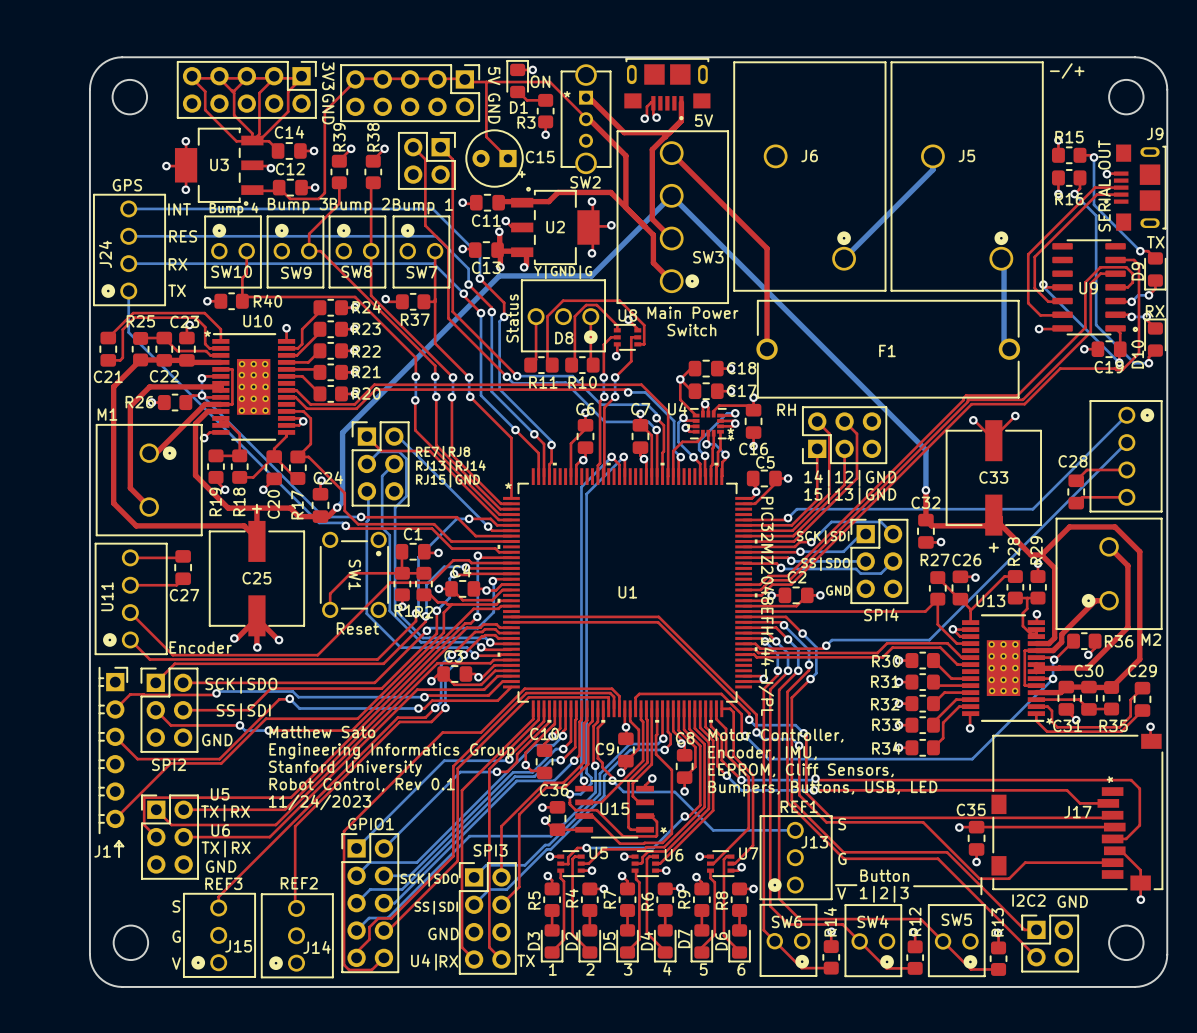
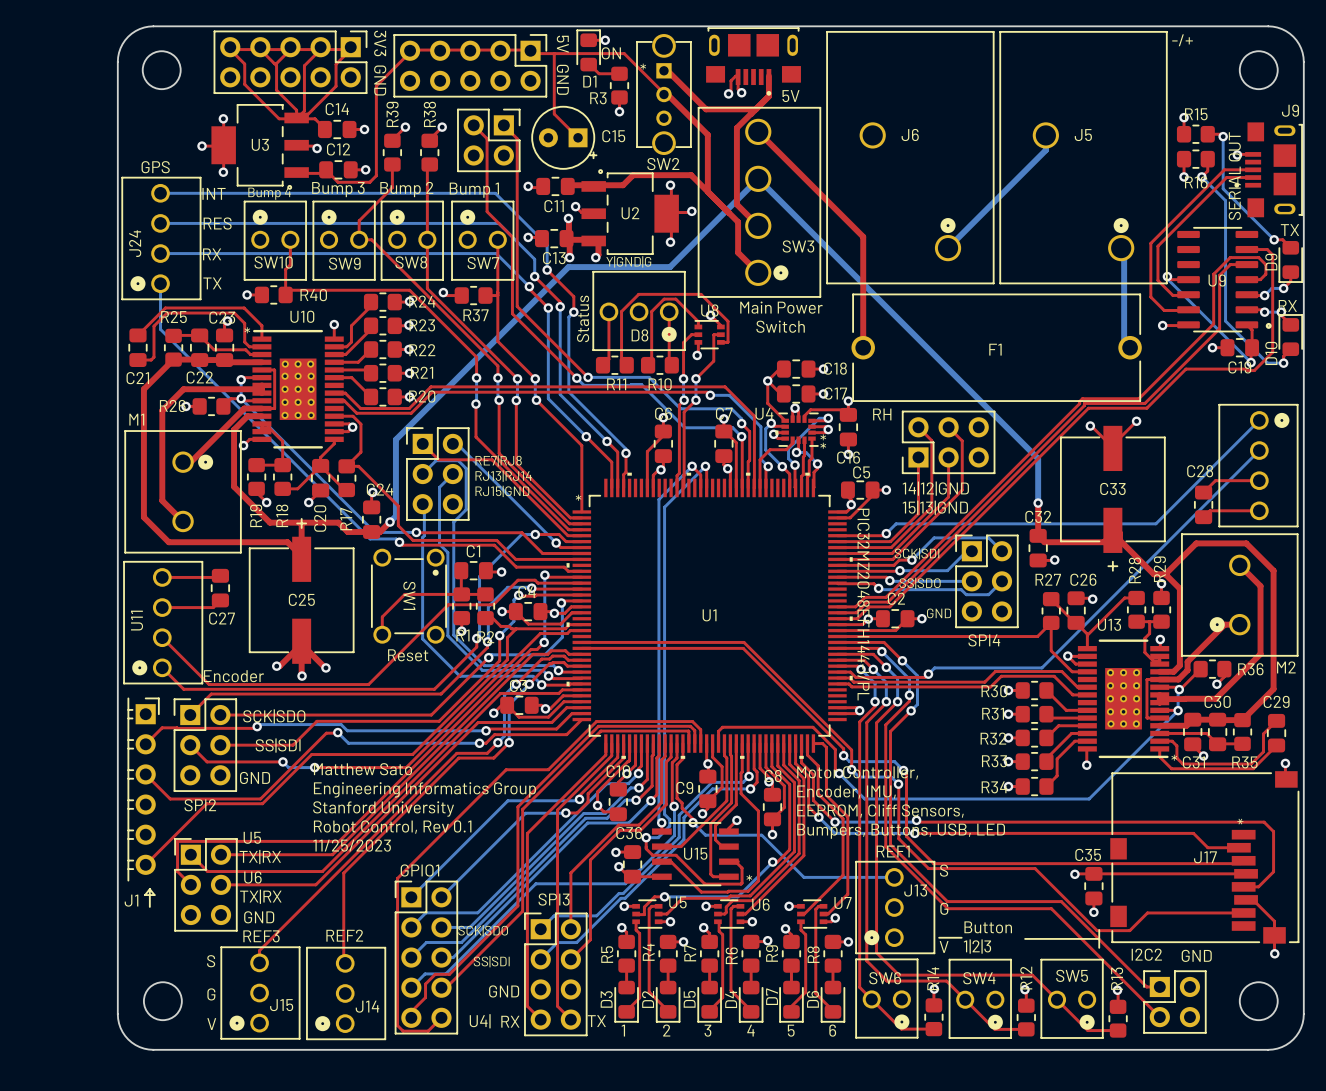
text: 11/24/2023 (320, 802) -> 11/25/2023 (352, 845)

